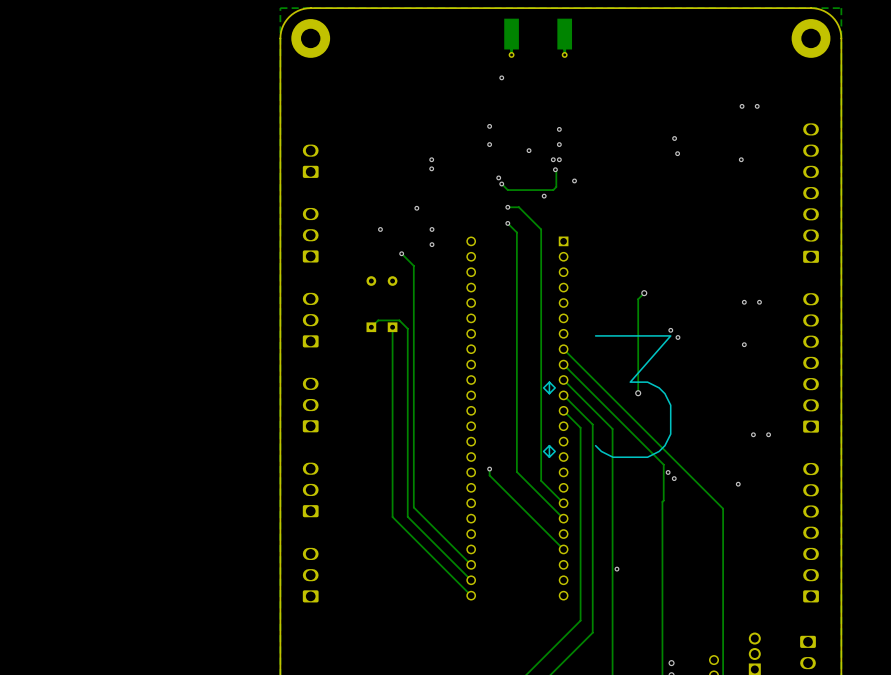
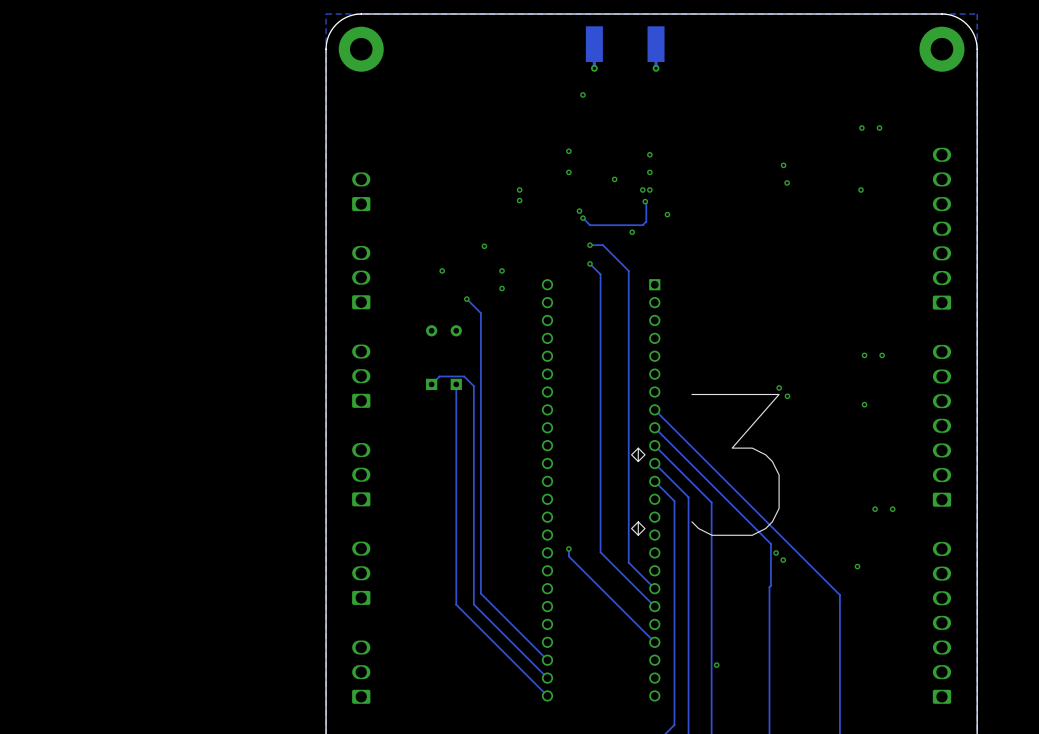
via: (431, 159) -> none
via: none -> (519, 189)
via: (431, 168) -> none
via: none -> (519, 200)
track: (644, 293) (638, 299) (638, 393) -> none
via: (644, 293) -> none
via: (638, 393) -> none

